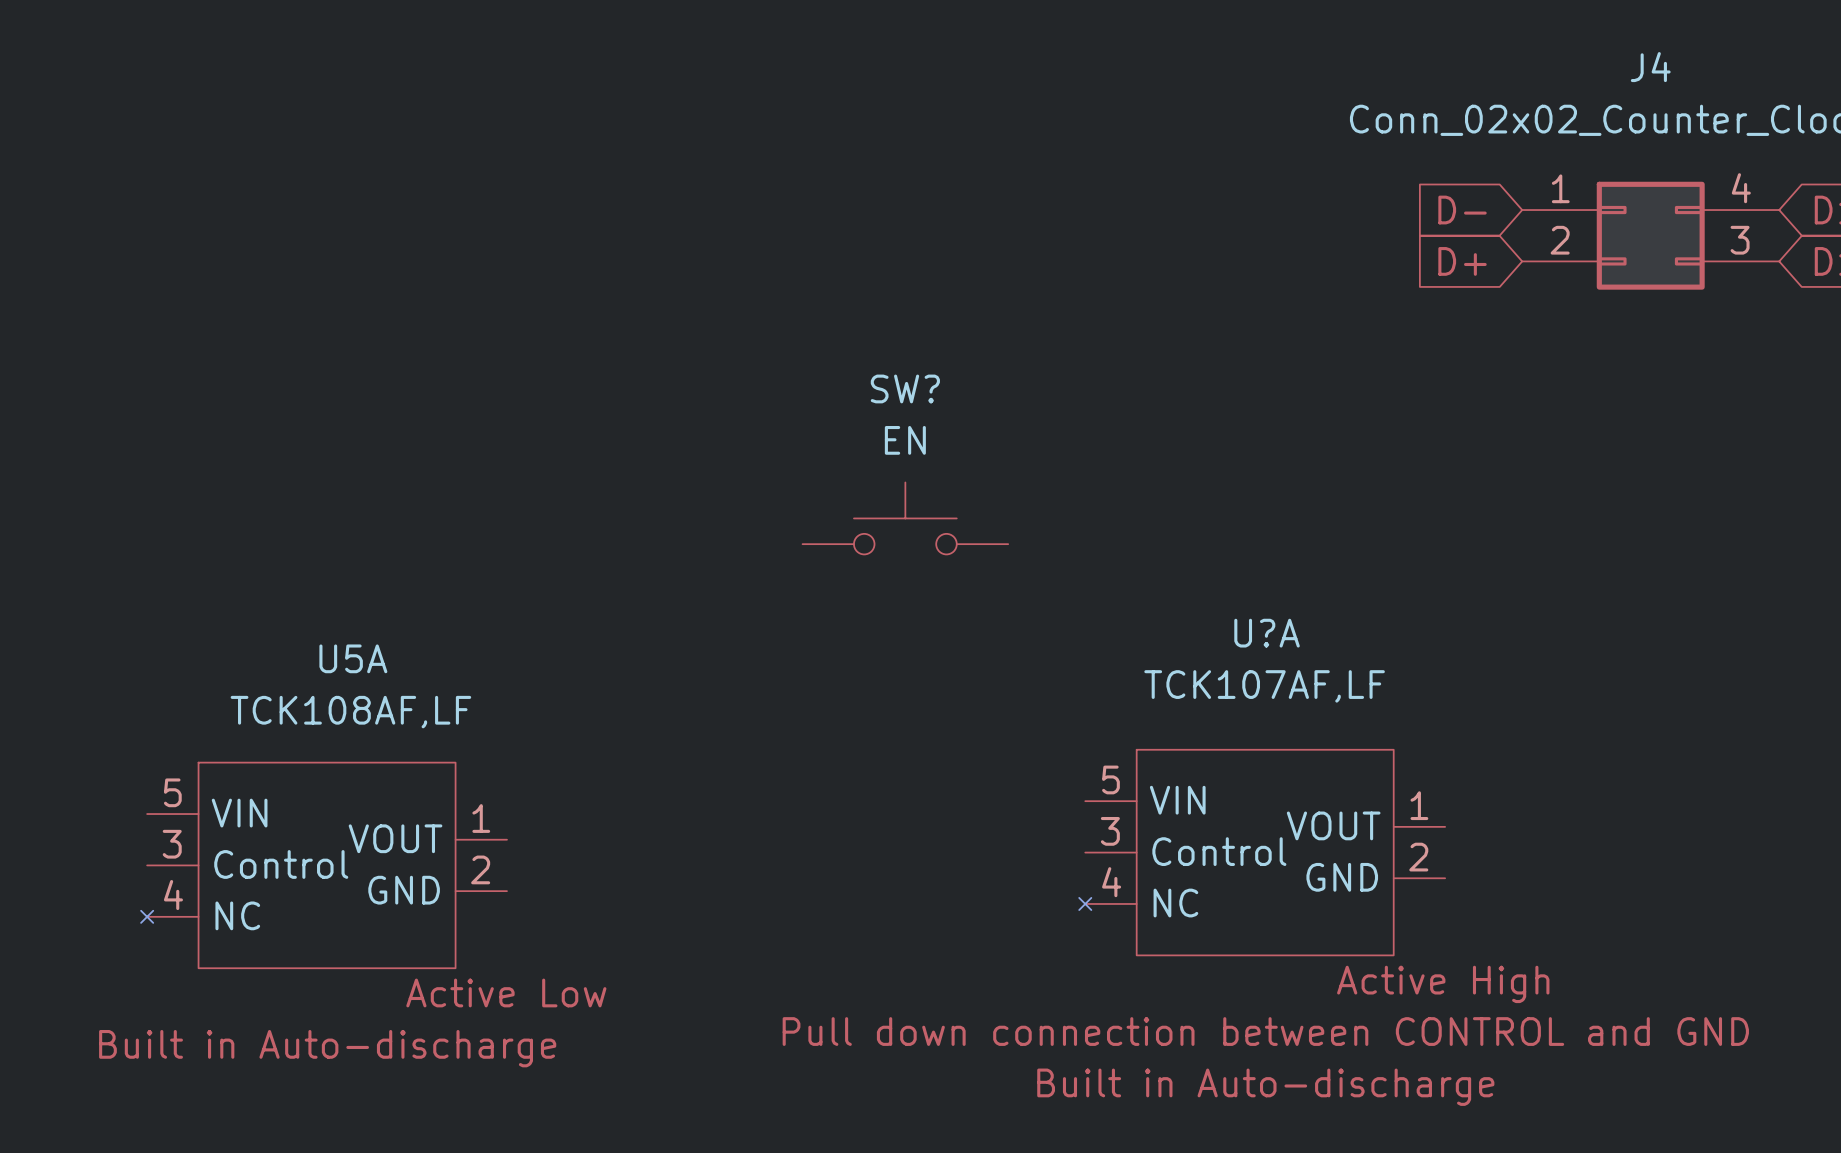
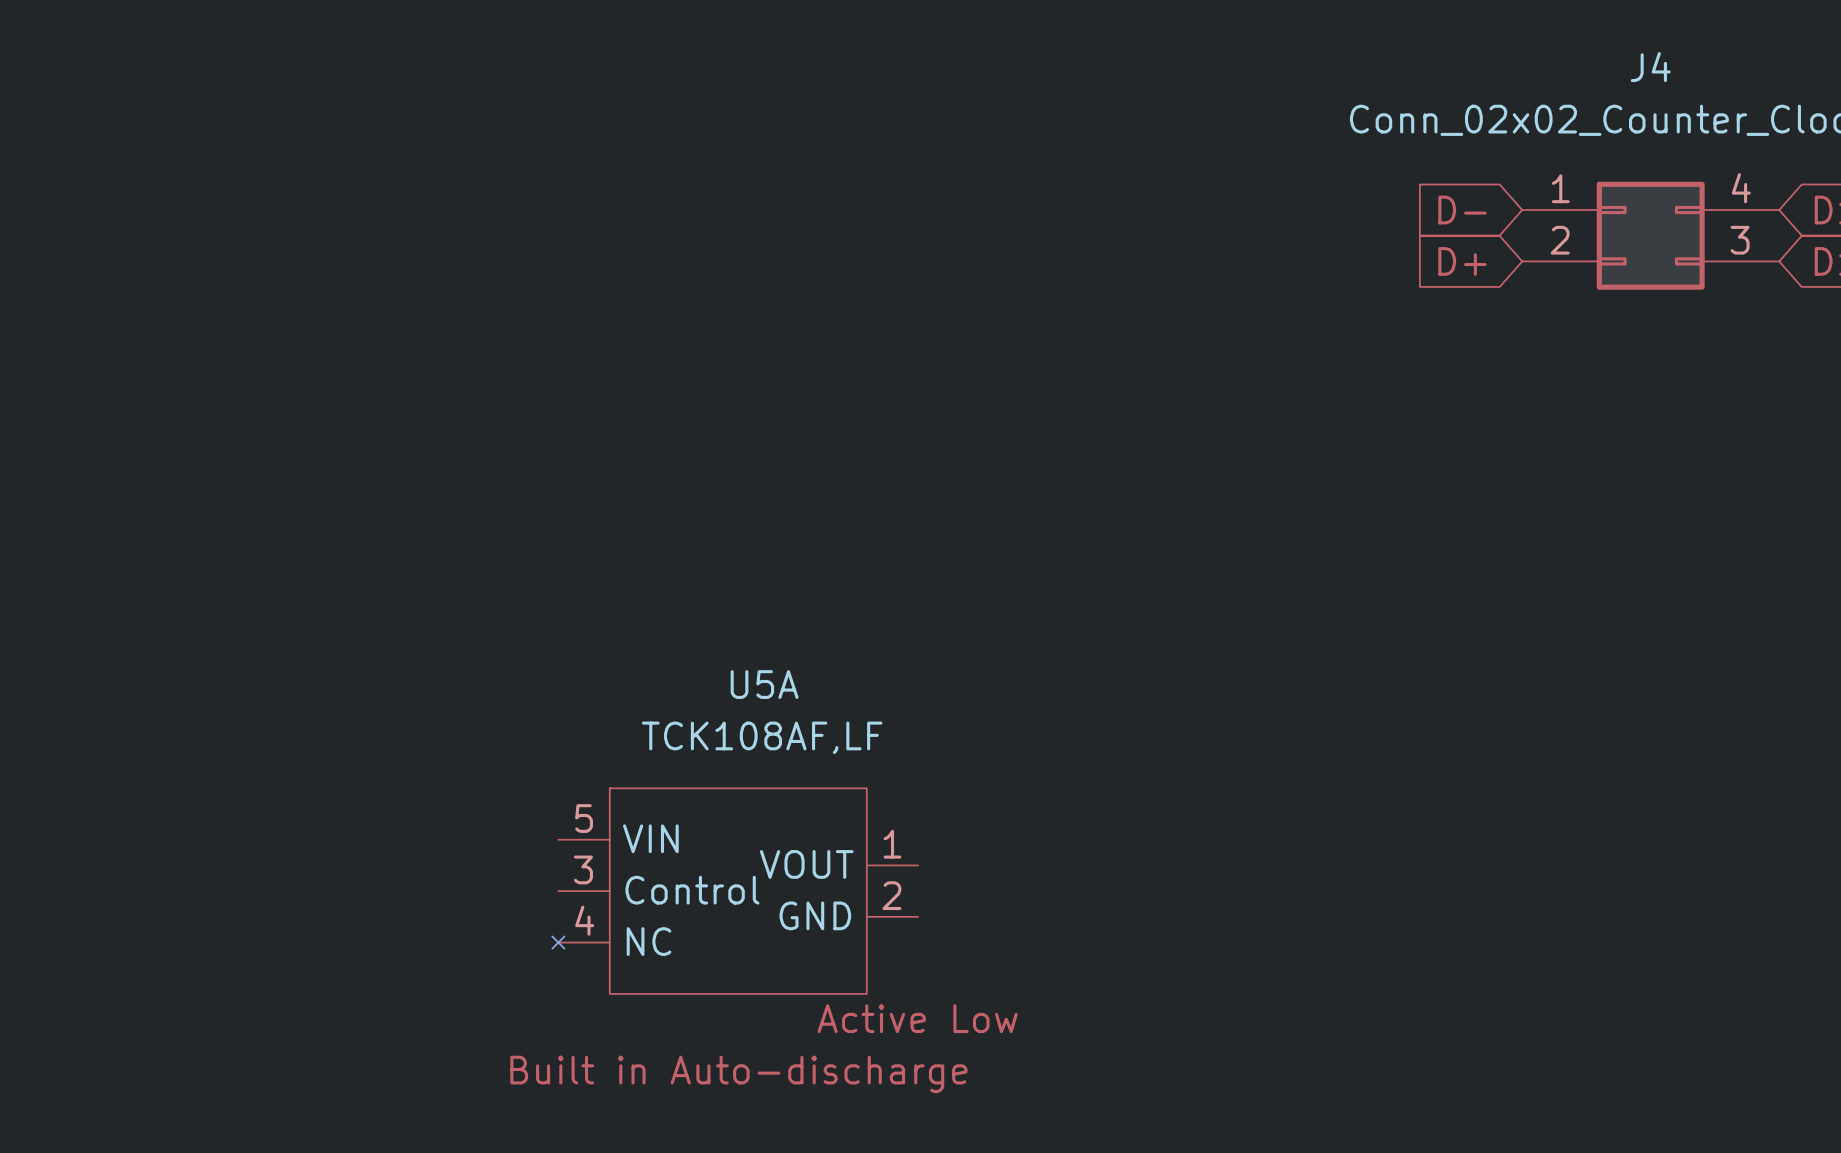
SW?: EN (905, 518) -> none
U?A: TCK107AF,LF (1262, 852) -> none
U5A position: (324, 865) -> (735, 891)

